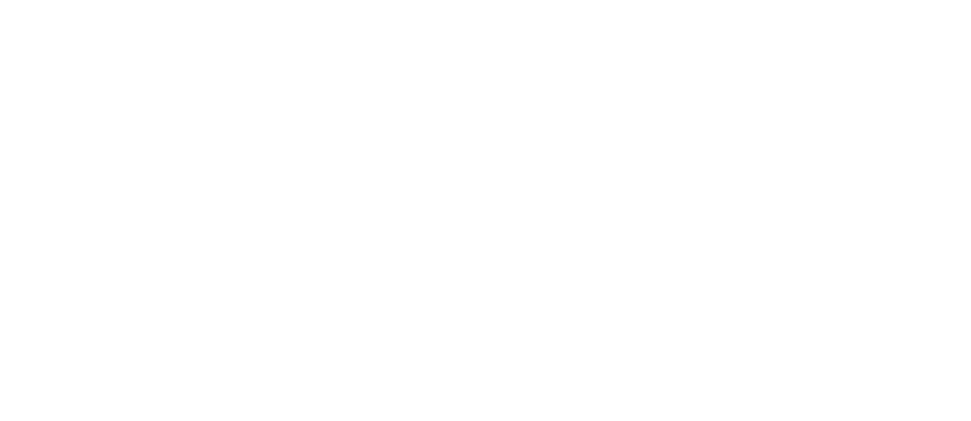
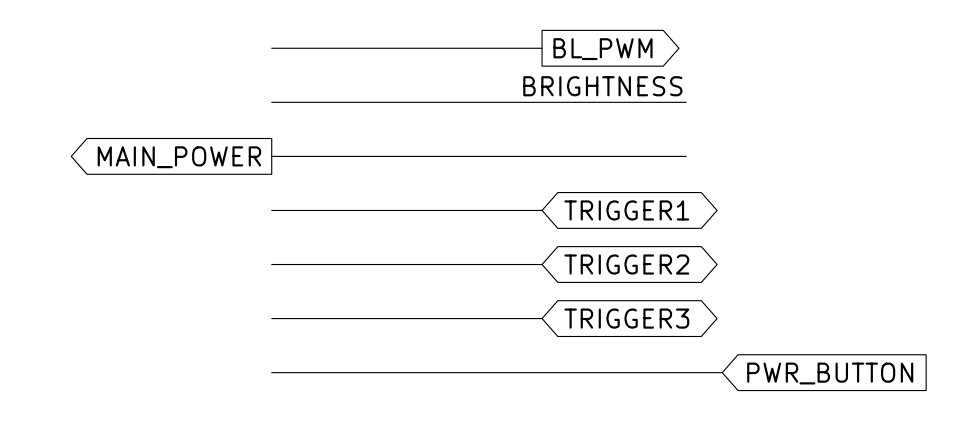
wire: none -> (271, 48) (542, 48)
global label: none -> BL_PWM (603, 49)
label: none -> BRIGHTNESS (602, 86)
wire: none -> (271, 102) (686, 102)
wire: none -> (271, 156) (686, 156)
global label: none -> MAIN_POWER (179, 157)
wire: none -> (271, 210) (542, 210)
global label: none -> TRIGGER1 (626, 210)
wire: none -> (271, 264) (542, 264)
global label: none -> TRIGGER2 (626, 264)
wire: none -> (271, 318) (542, 318)
global label: none -> TRIGGER3 (626, 318)
wire: none -> (271, 372) (722, 372)
global label: none -> PWR_BUTTON (830, 373)

